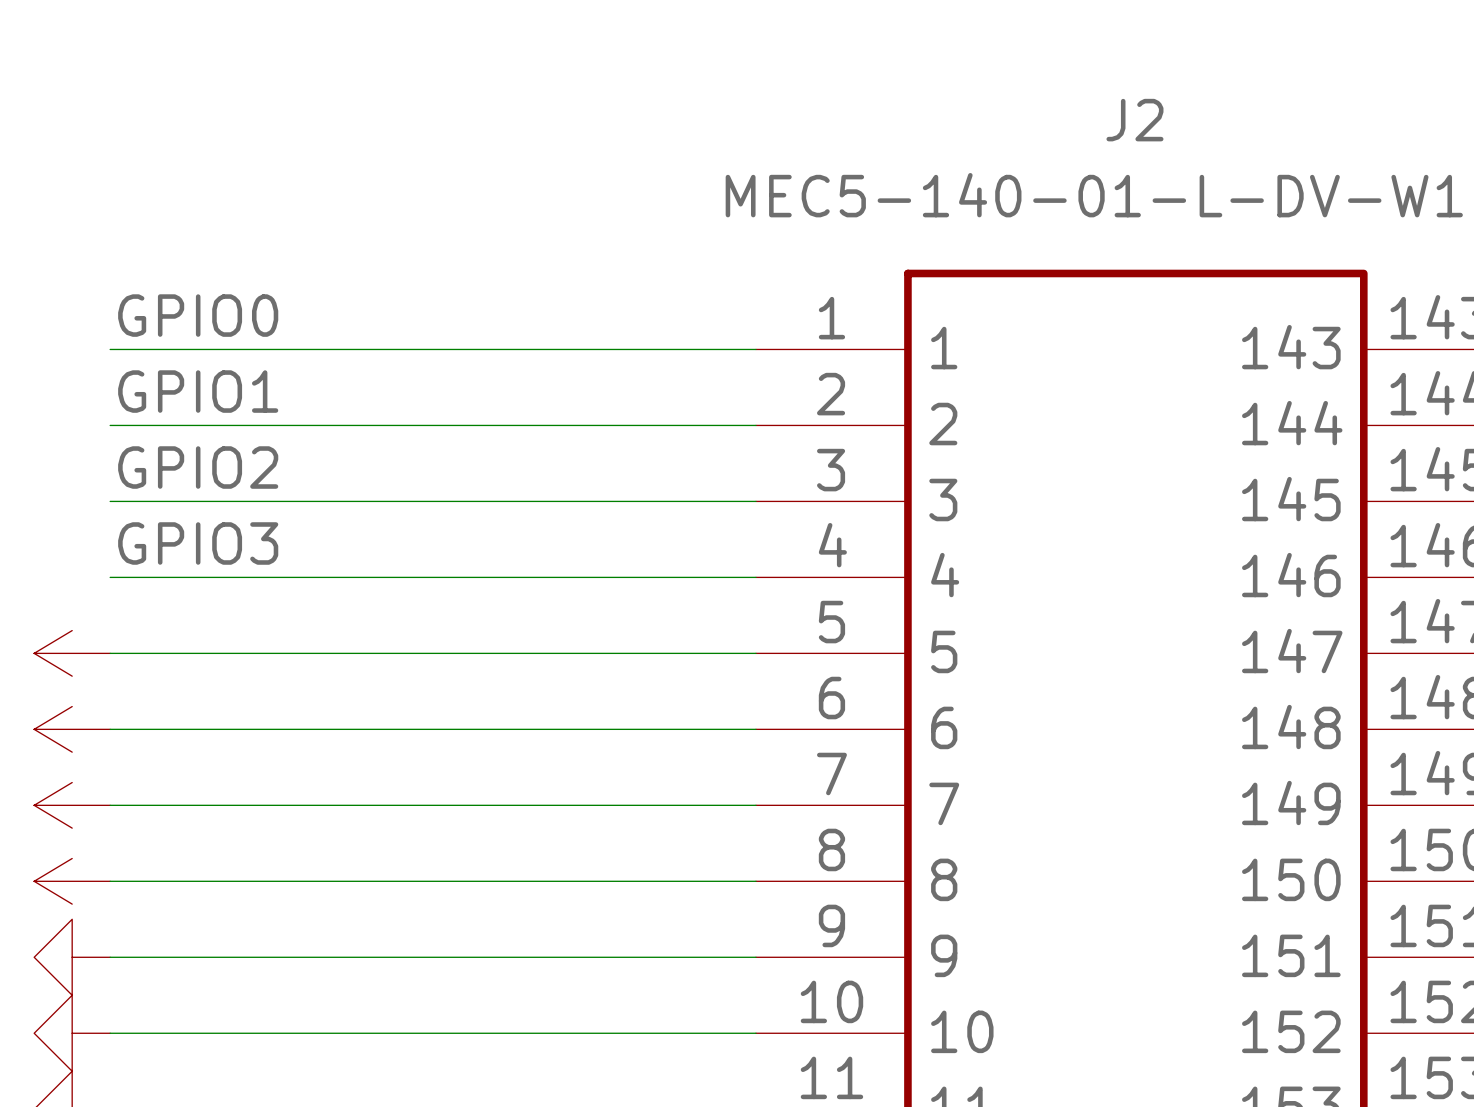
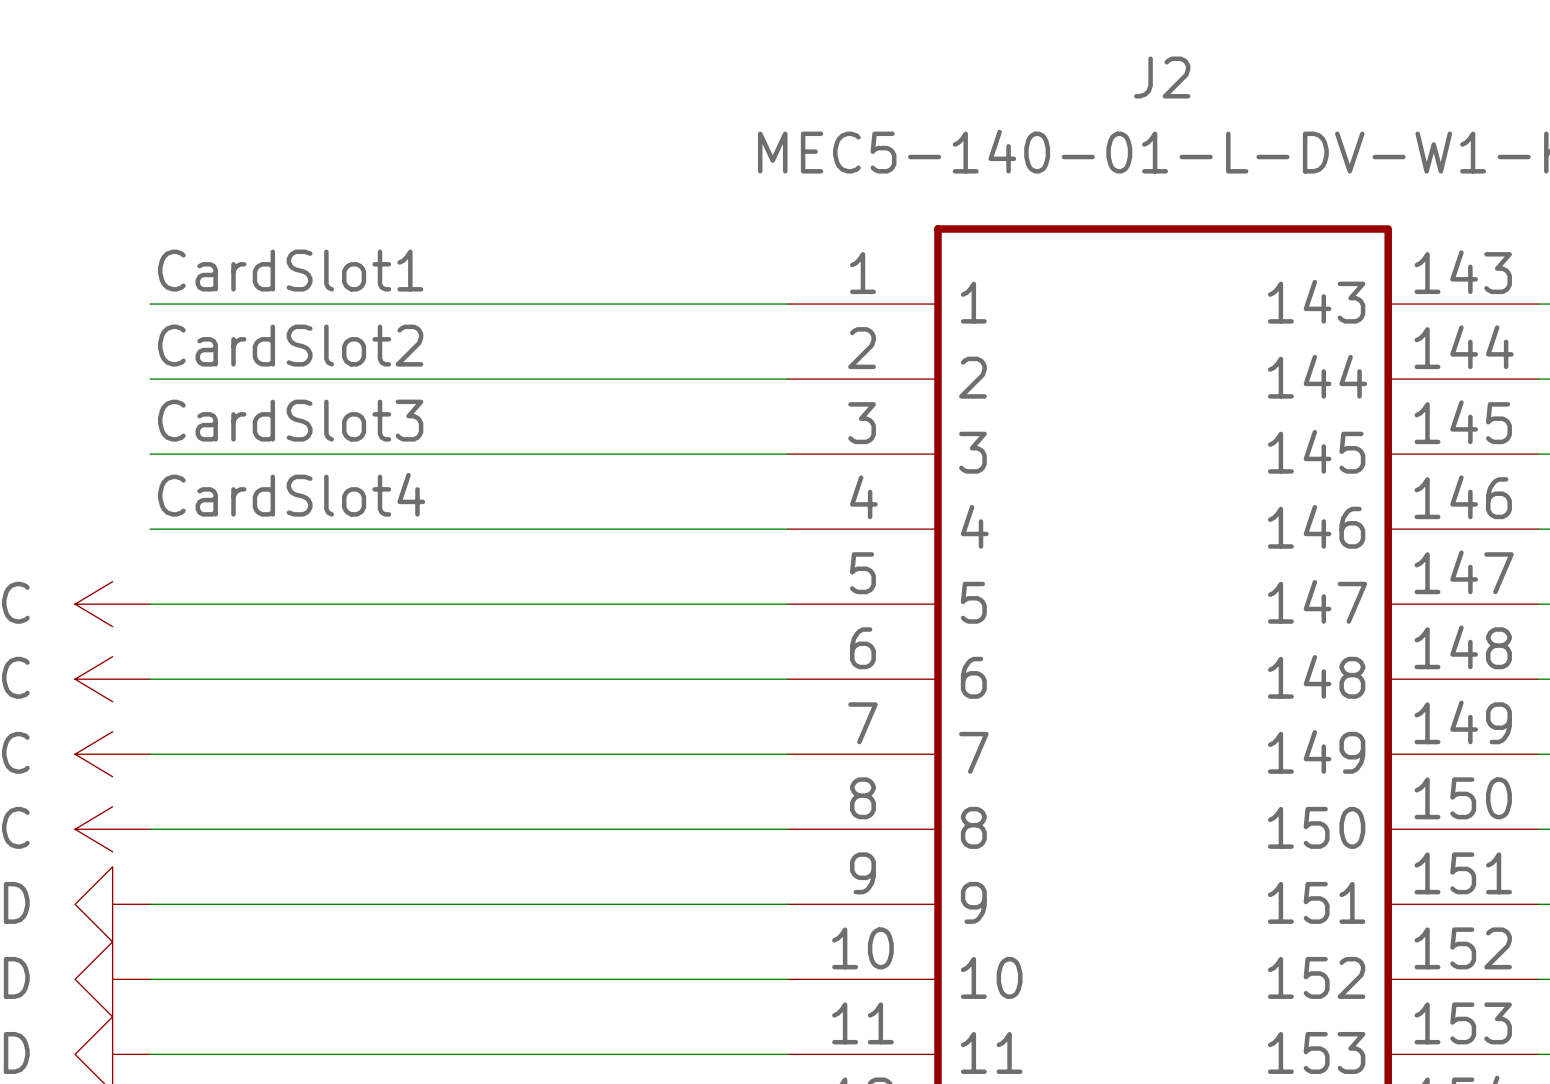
label: GPIO0 (198, 315) -> CardSlot1 (290, 270)
label: GPIO1 (198, 391) -> CardSlot2 (290, 345)
label: GPIO2 (198, 467) -> CardSlot3 (290, 420)
label: GPIO3 (198, 543) -> CardSlot4 (291, 494)

